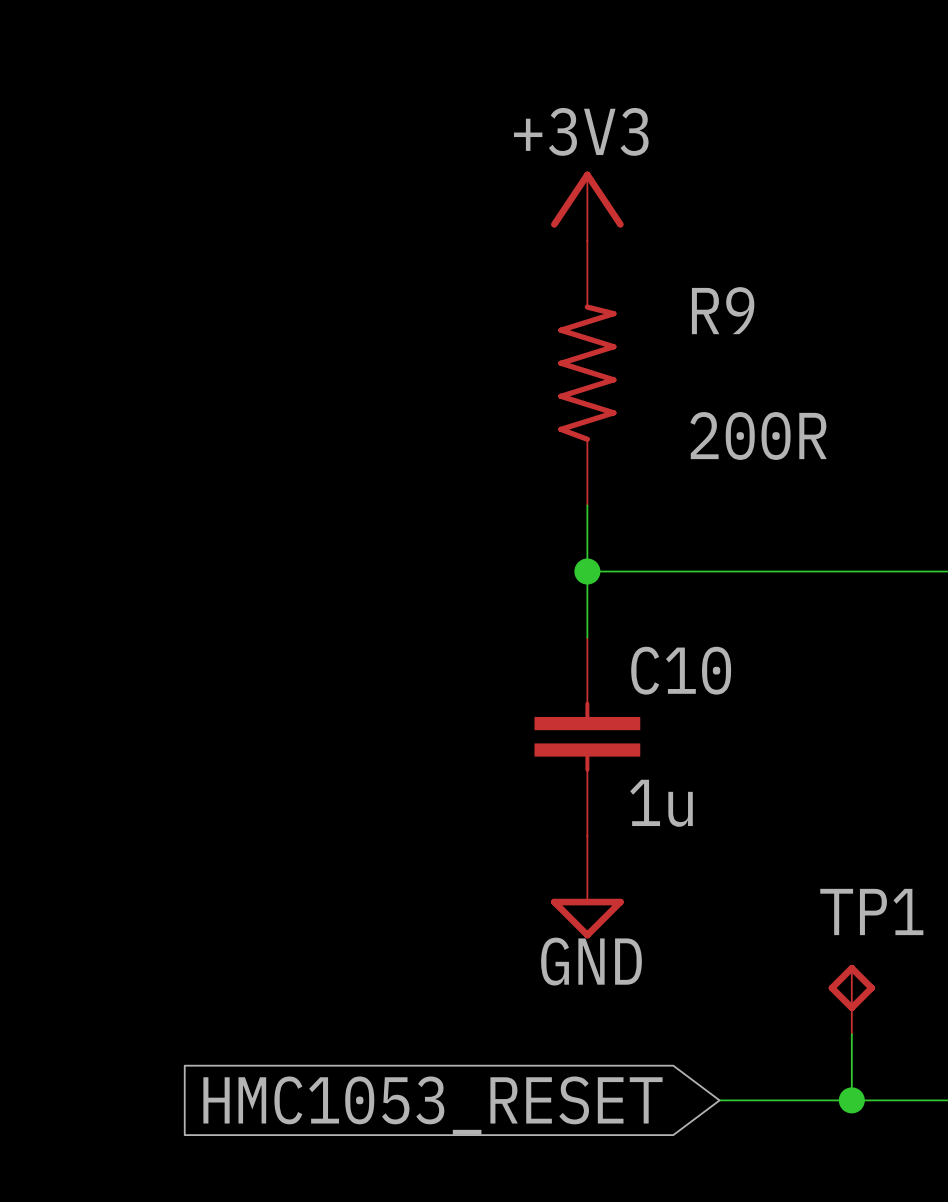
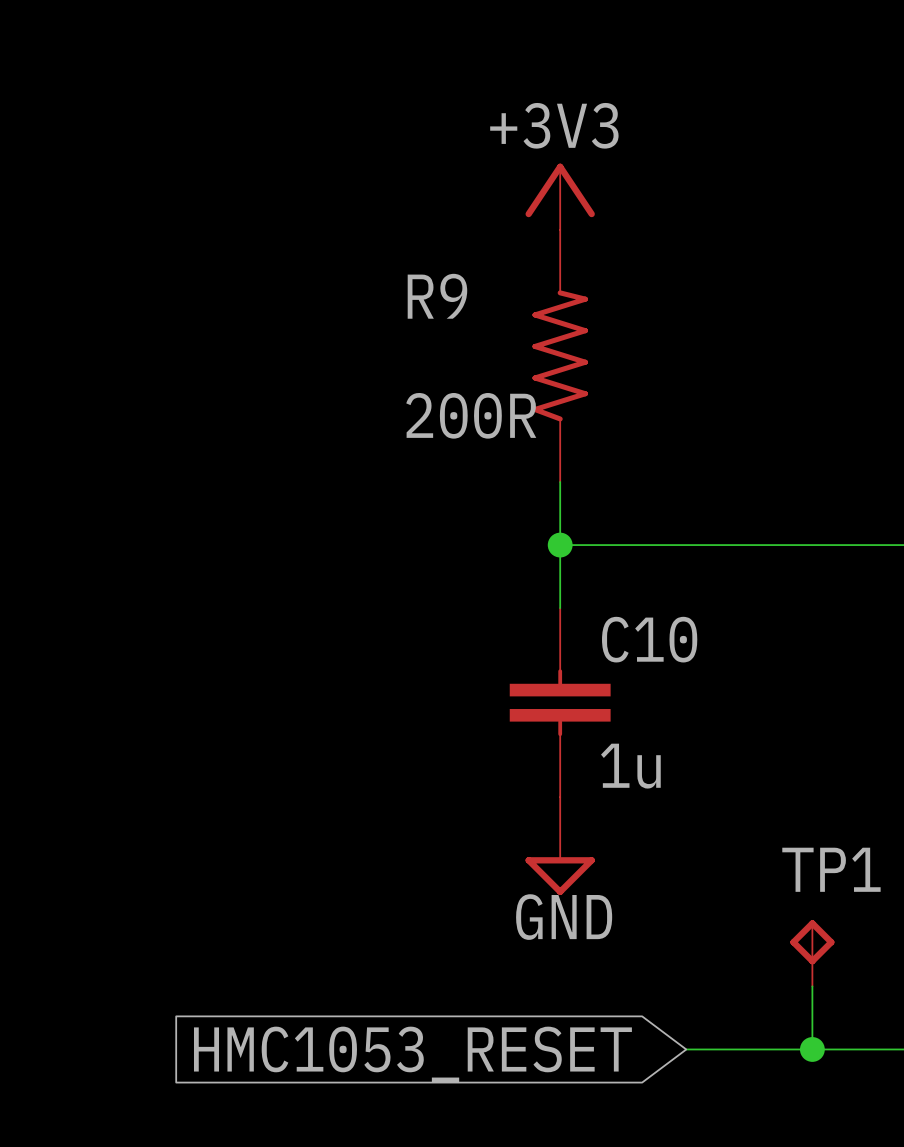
R9 name position: R9 (723, 310) -> R9 (437, 296)
R9 value position: 200R (758, 435) -> 200R (471, 415)

